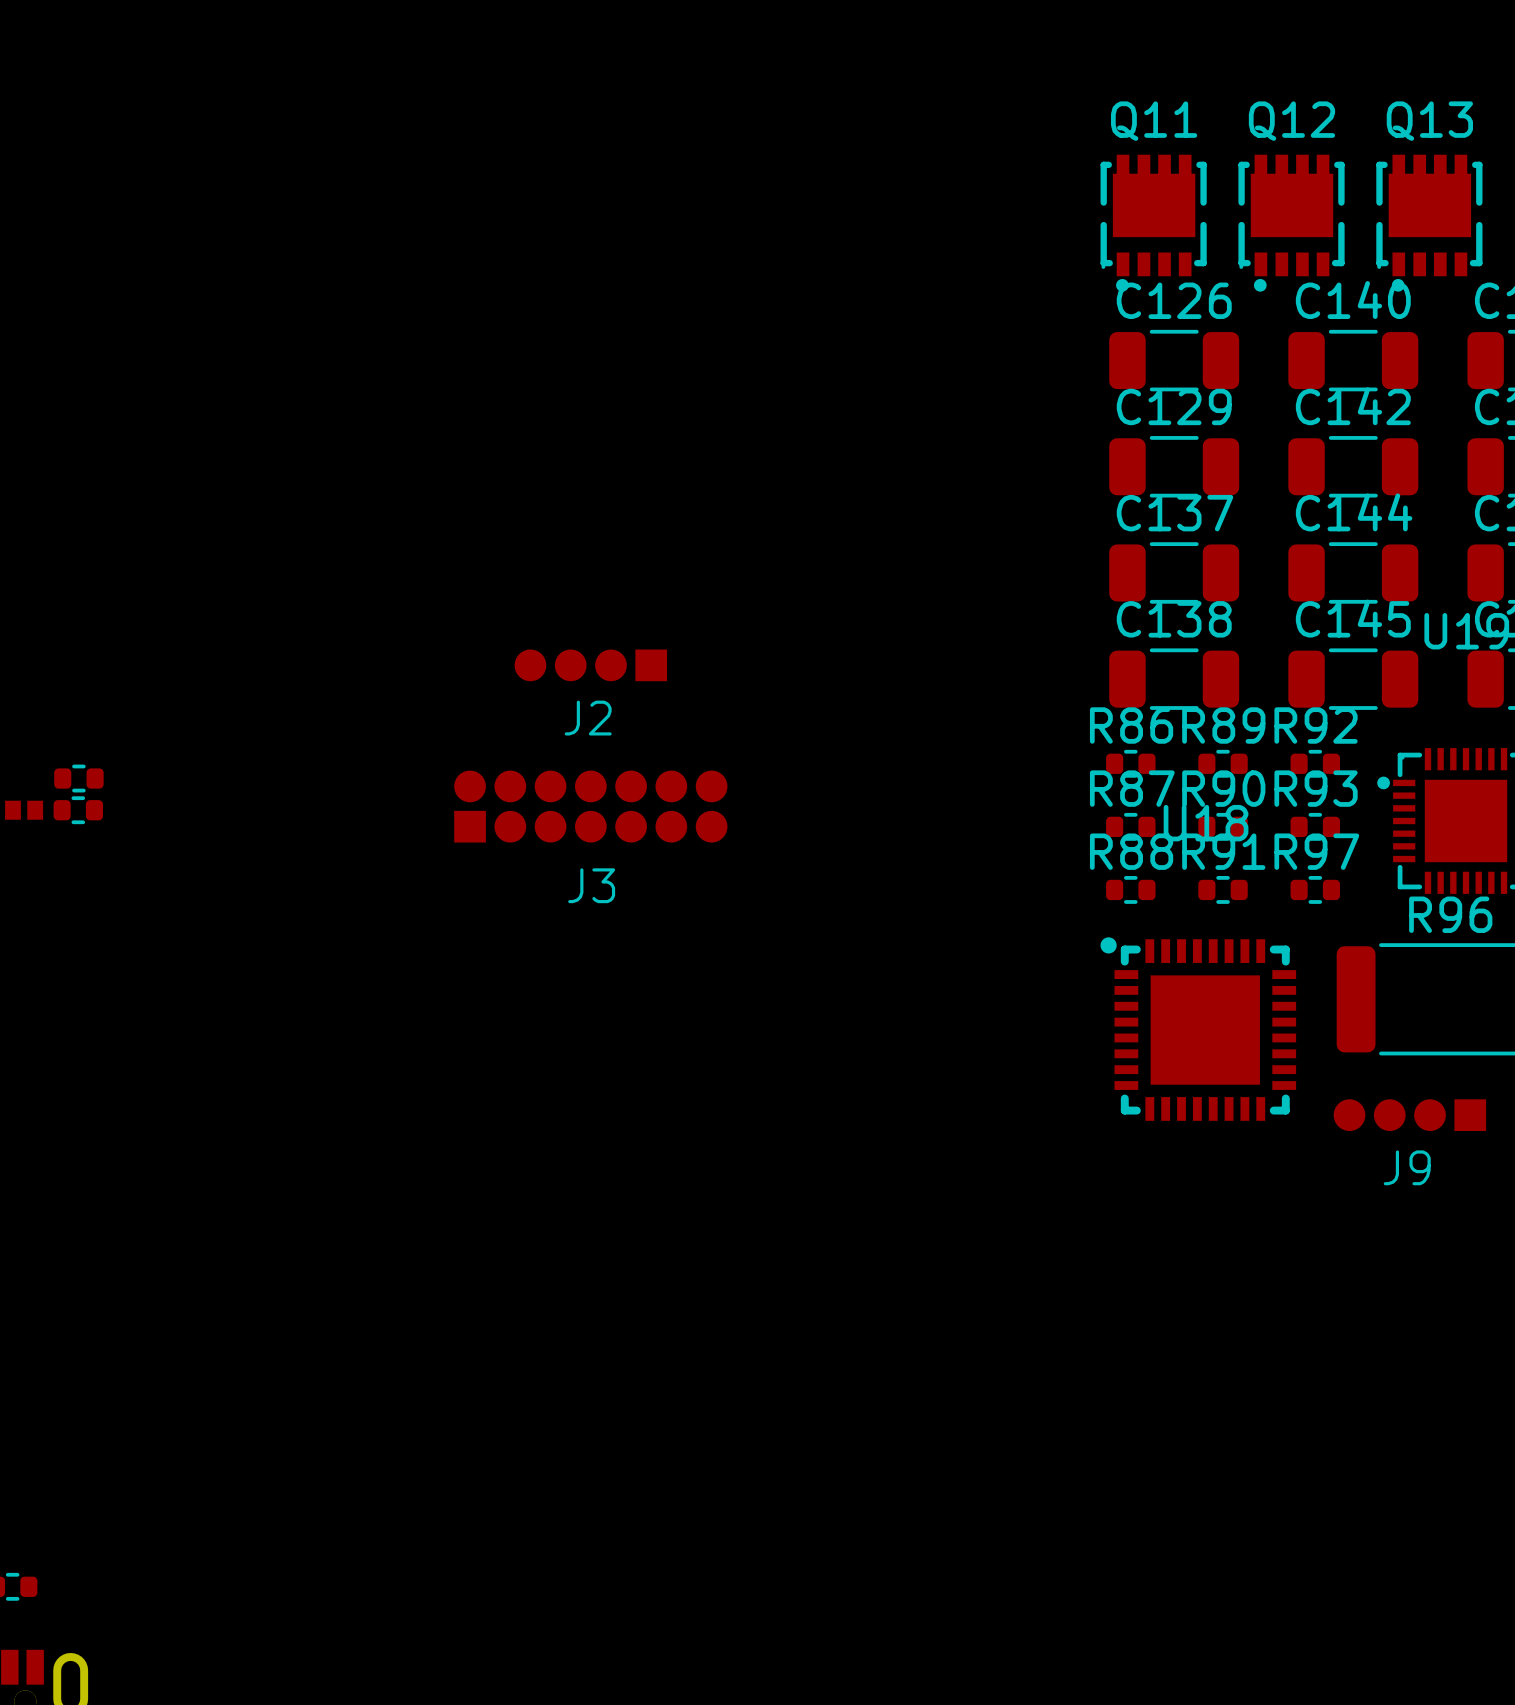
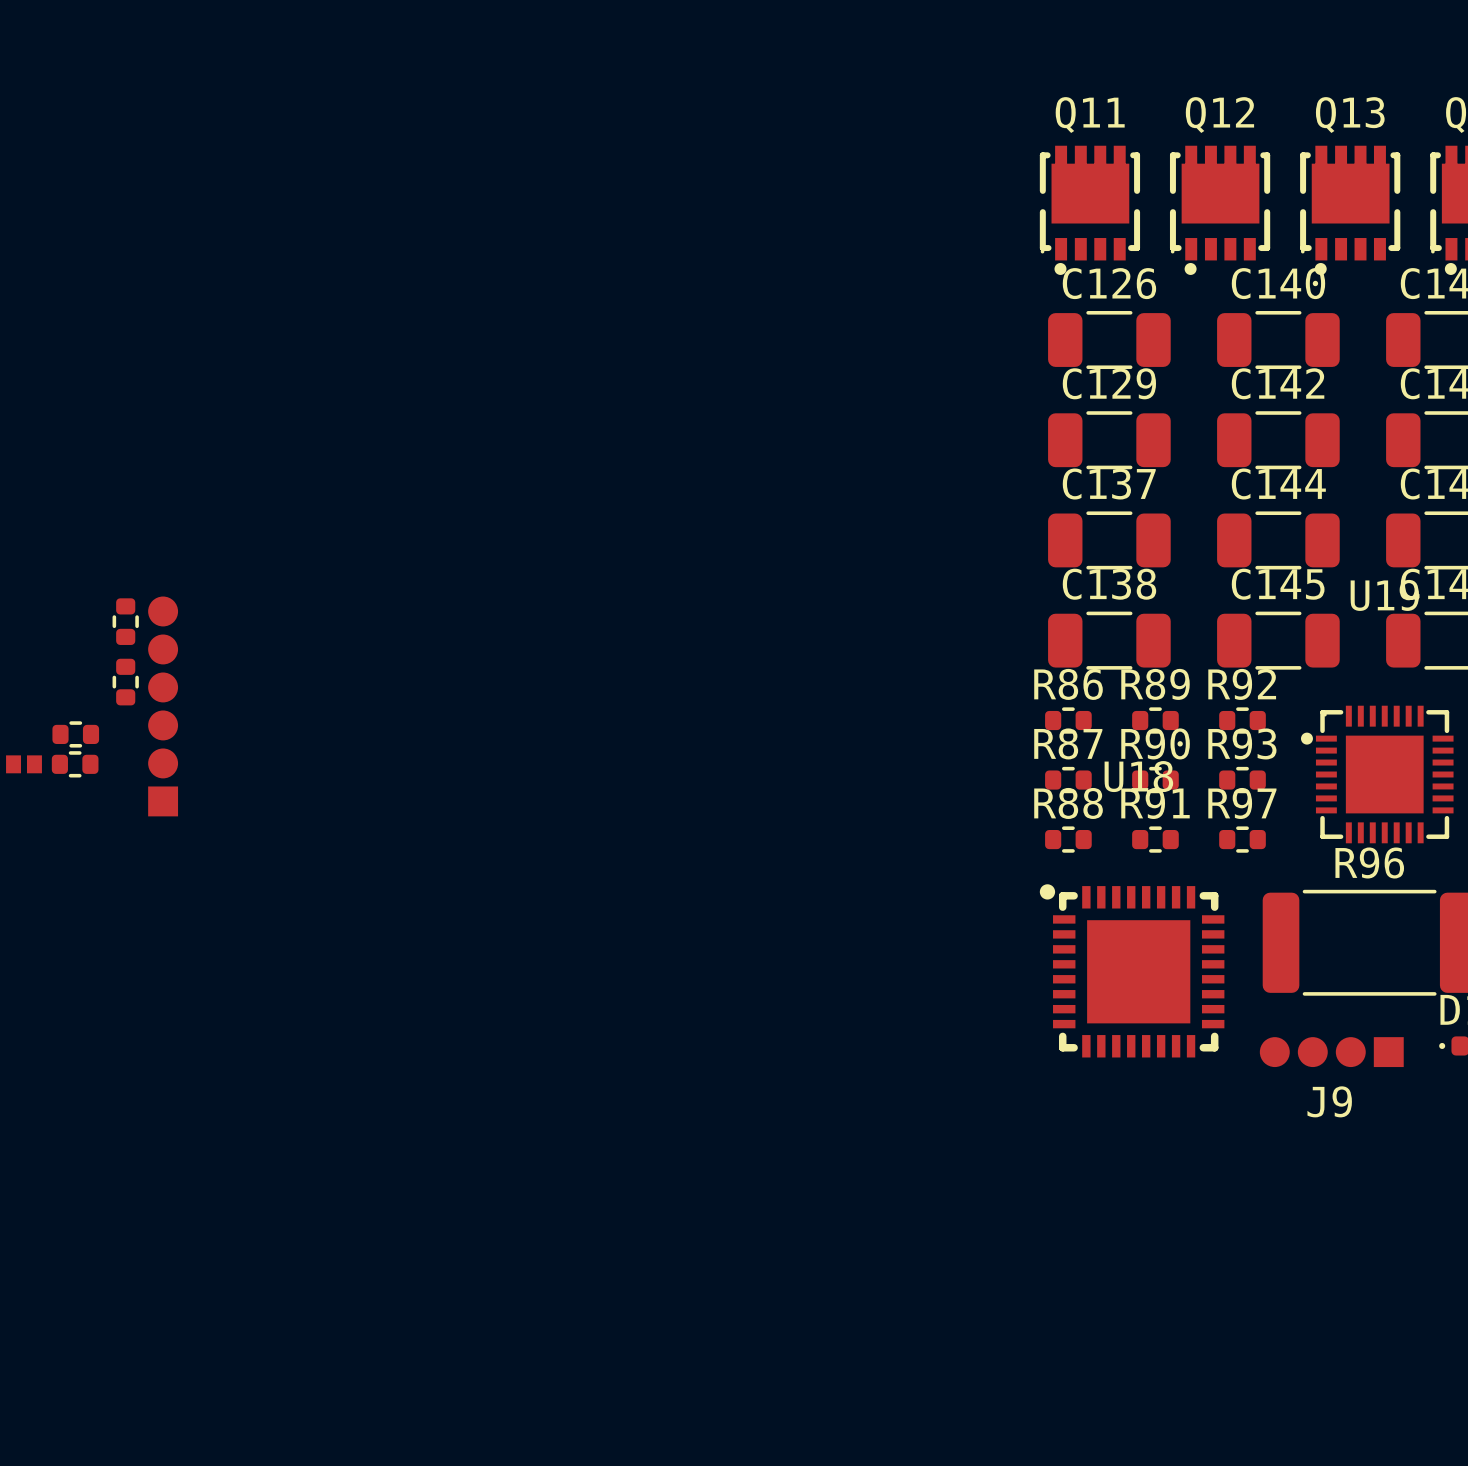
part: none -> (125, 621)
J2: (590, 665) -> none
part: none -> (125, 682)
part: none -> (163, 706)
J3: (590, 806) -> none

